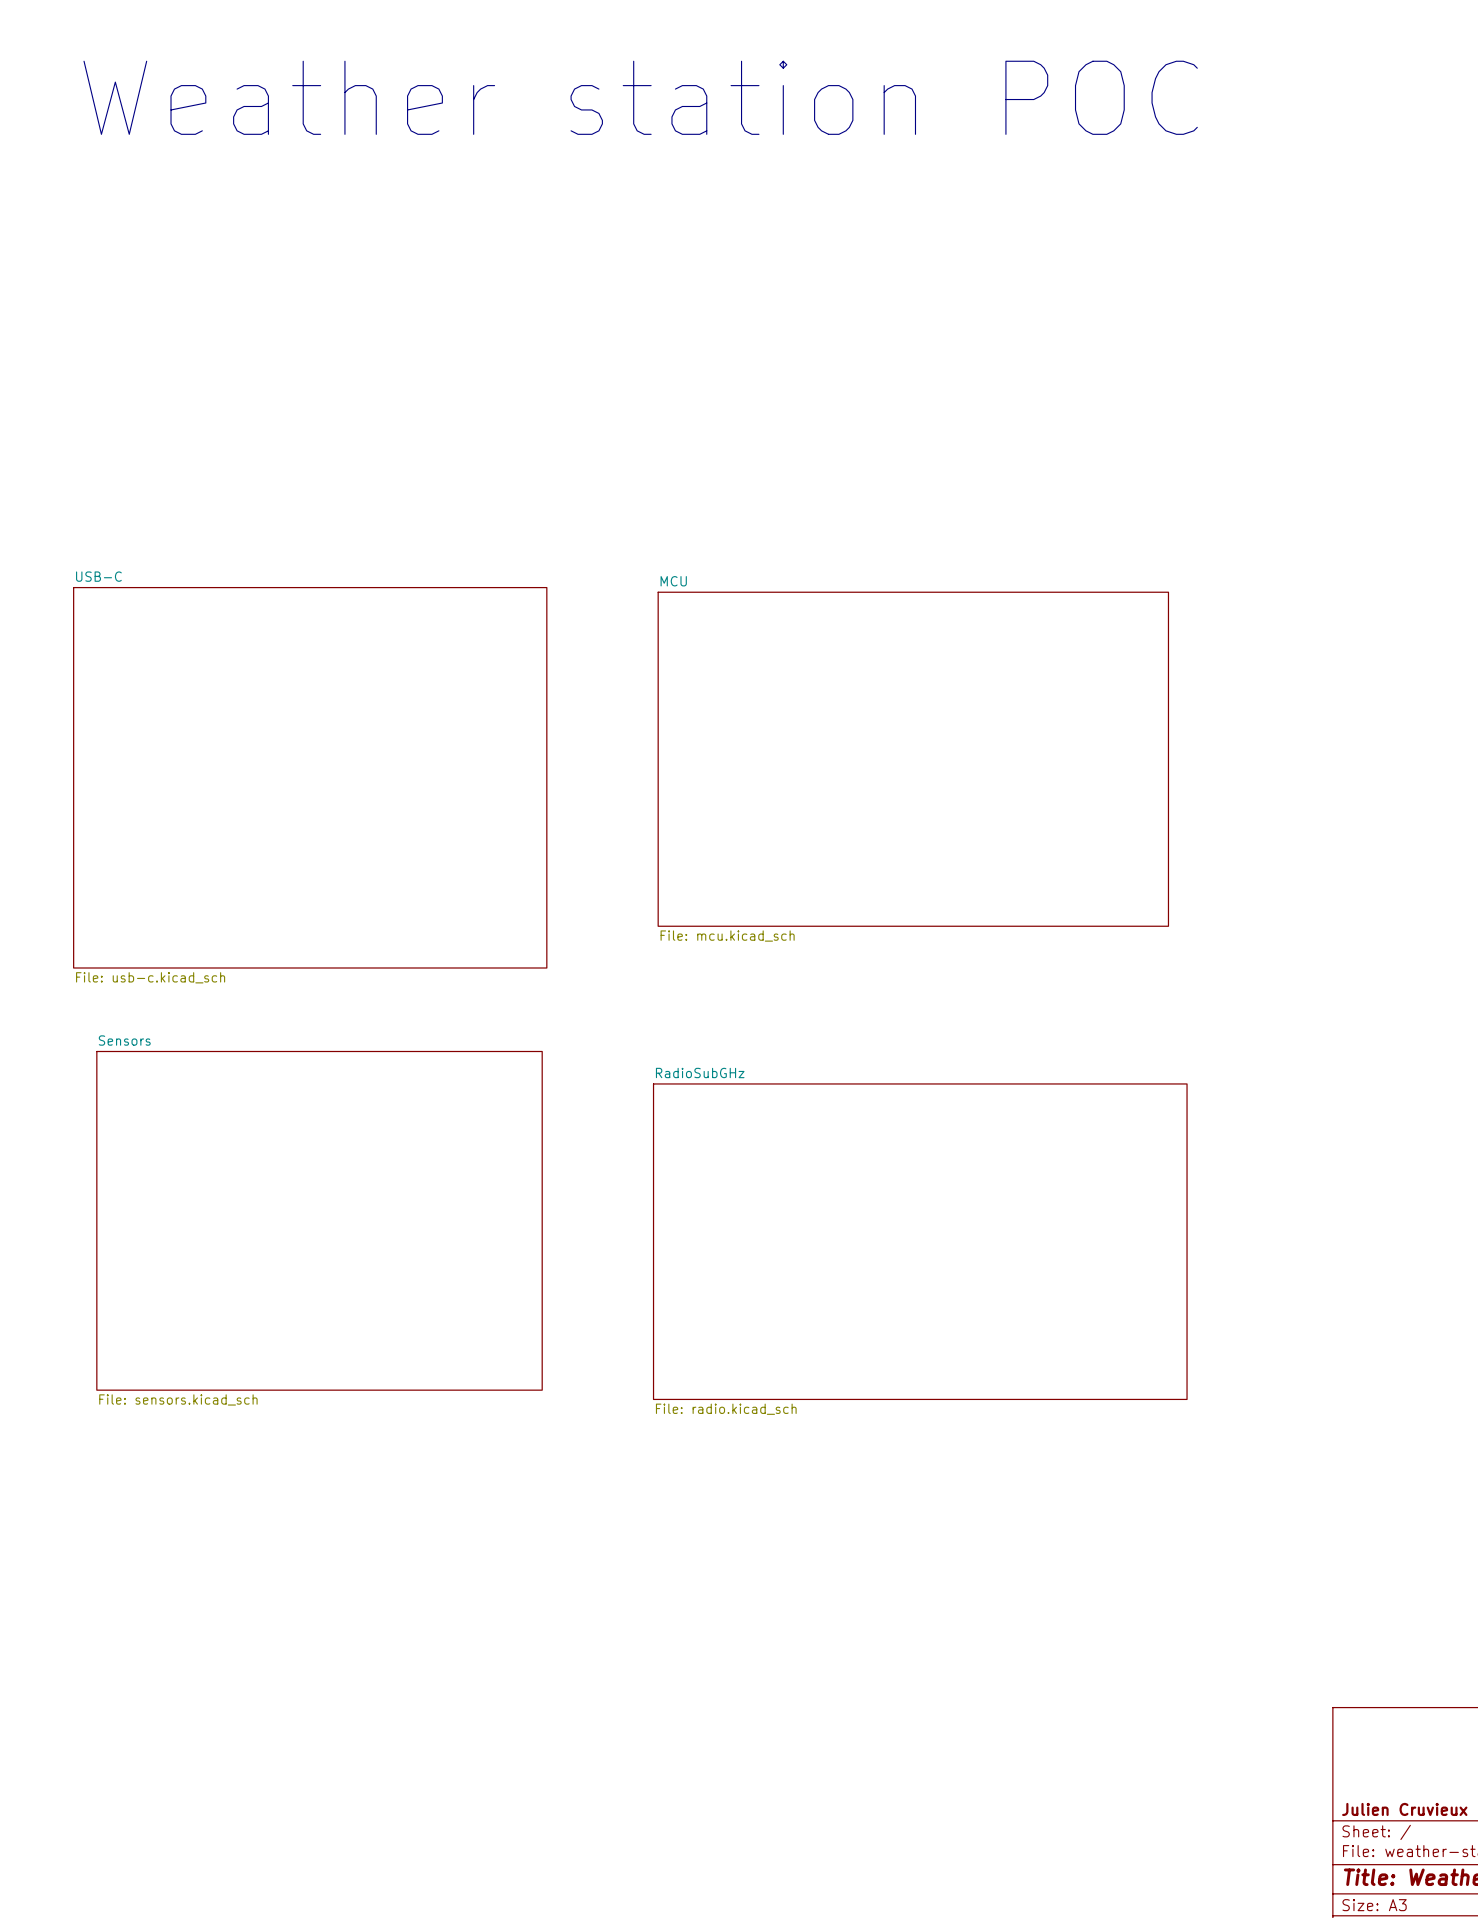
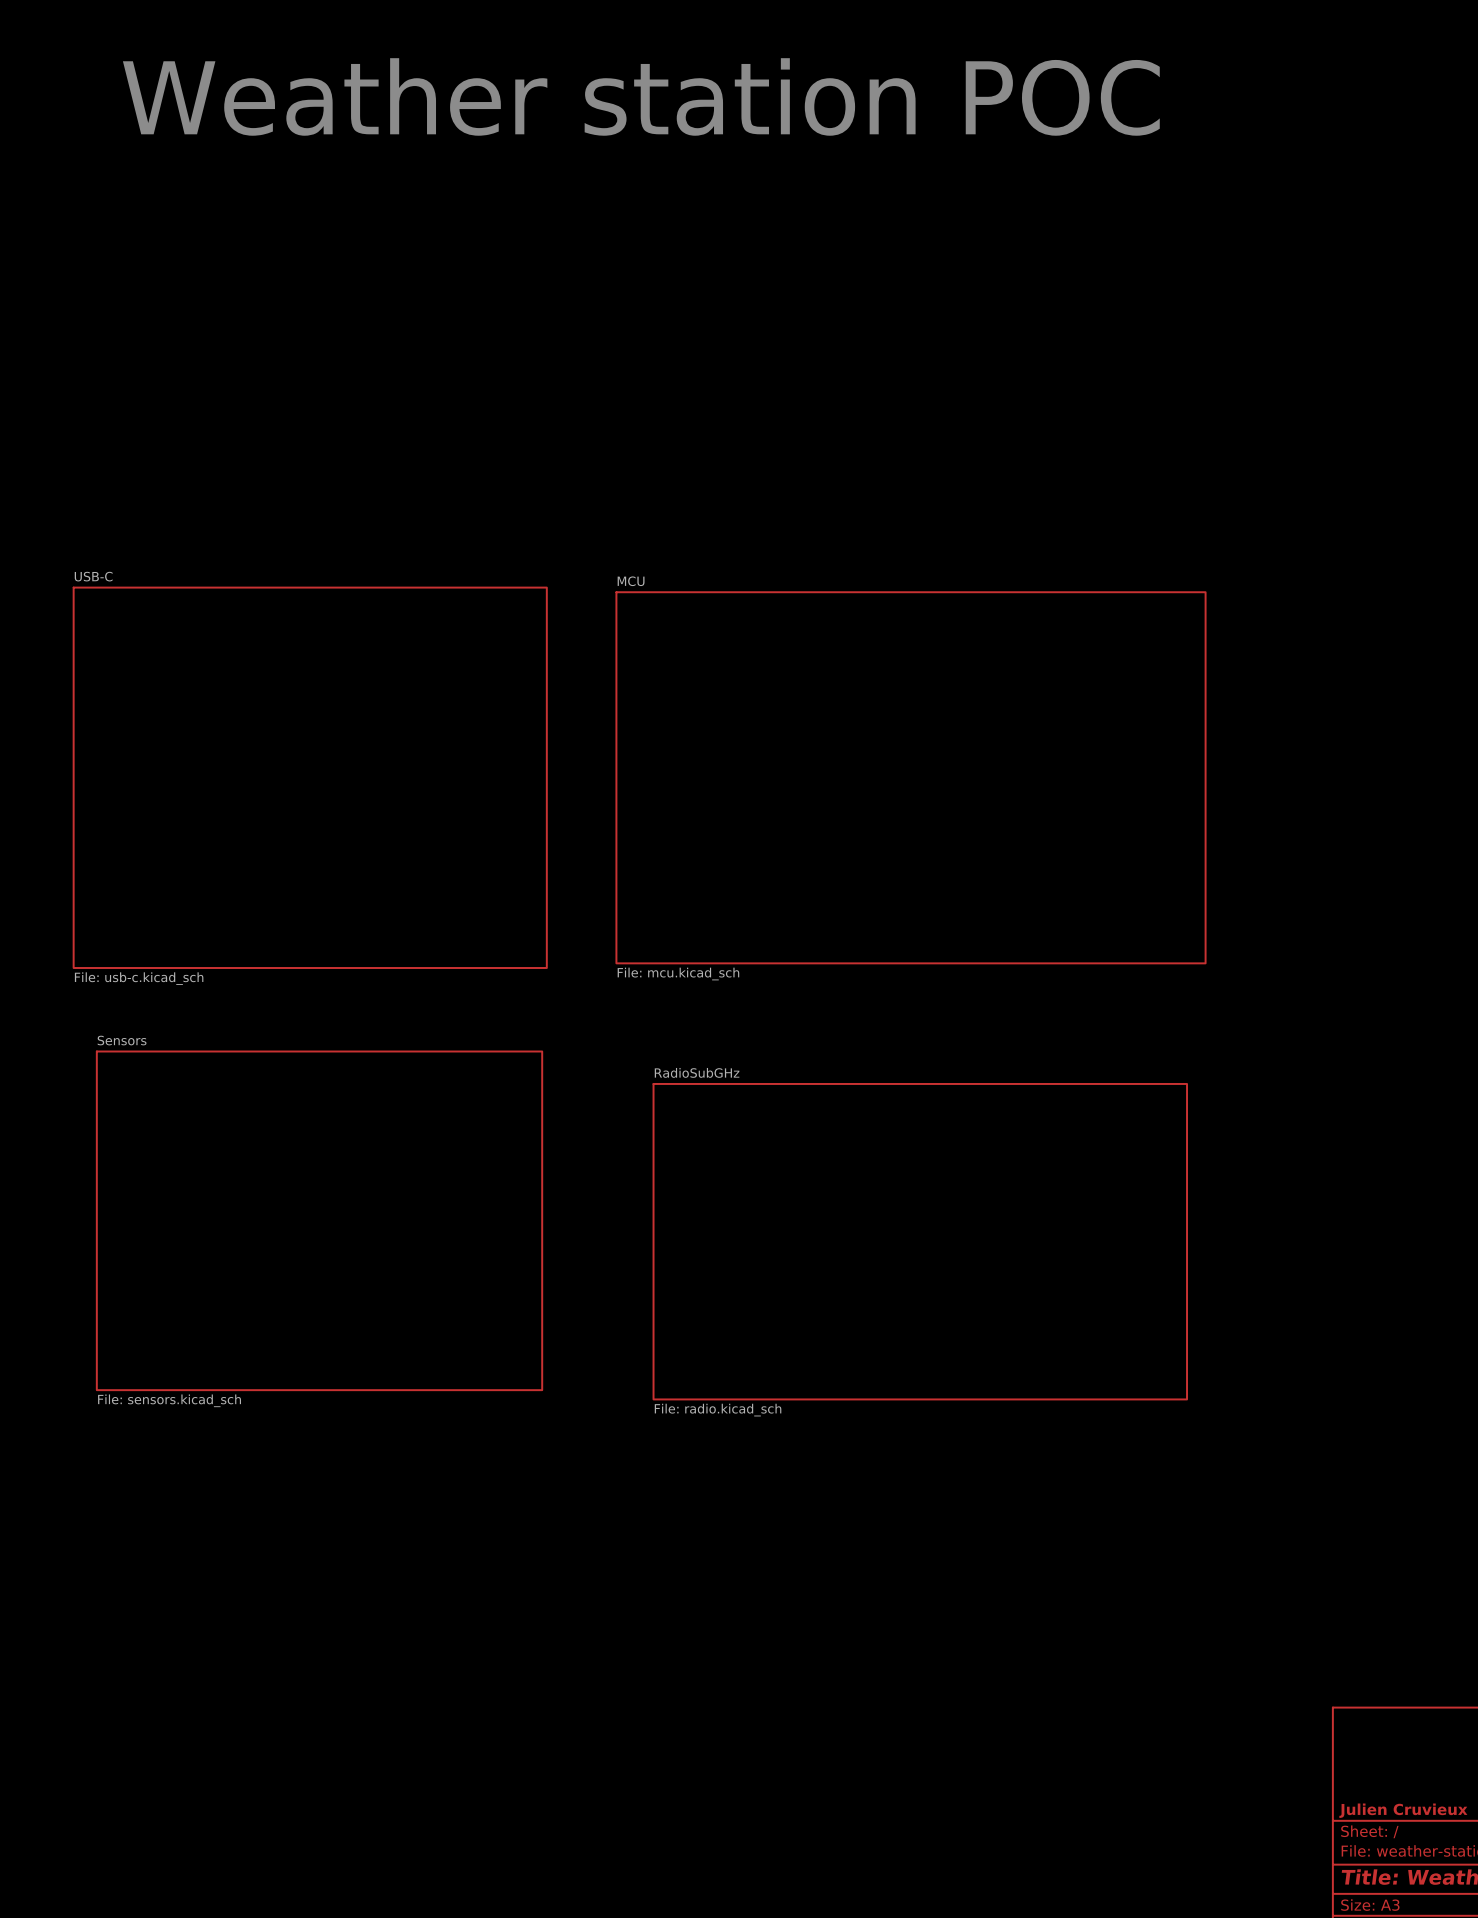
sheet MCU: File: mcu.kicad_sch (913, 759) -> none
sheet MCU: none -> File: mcu.kicad_sch (911, 777)

